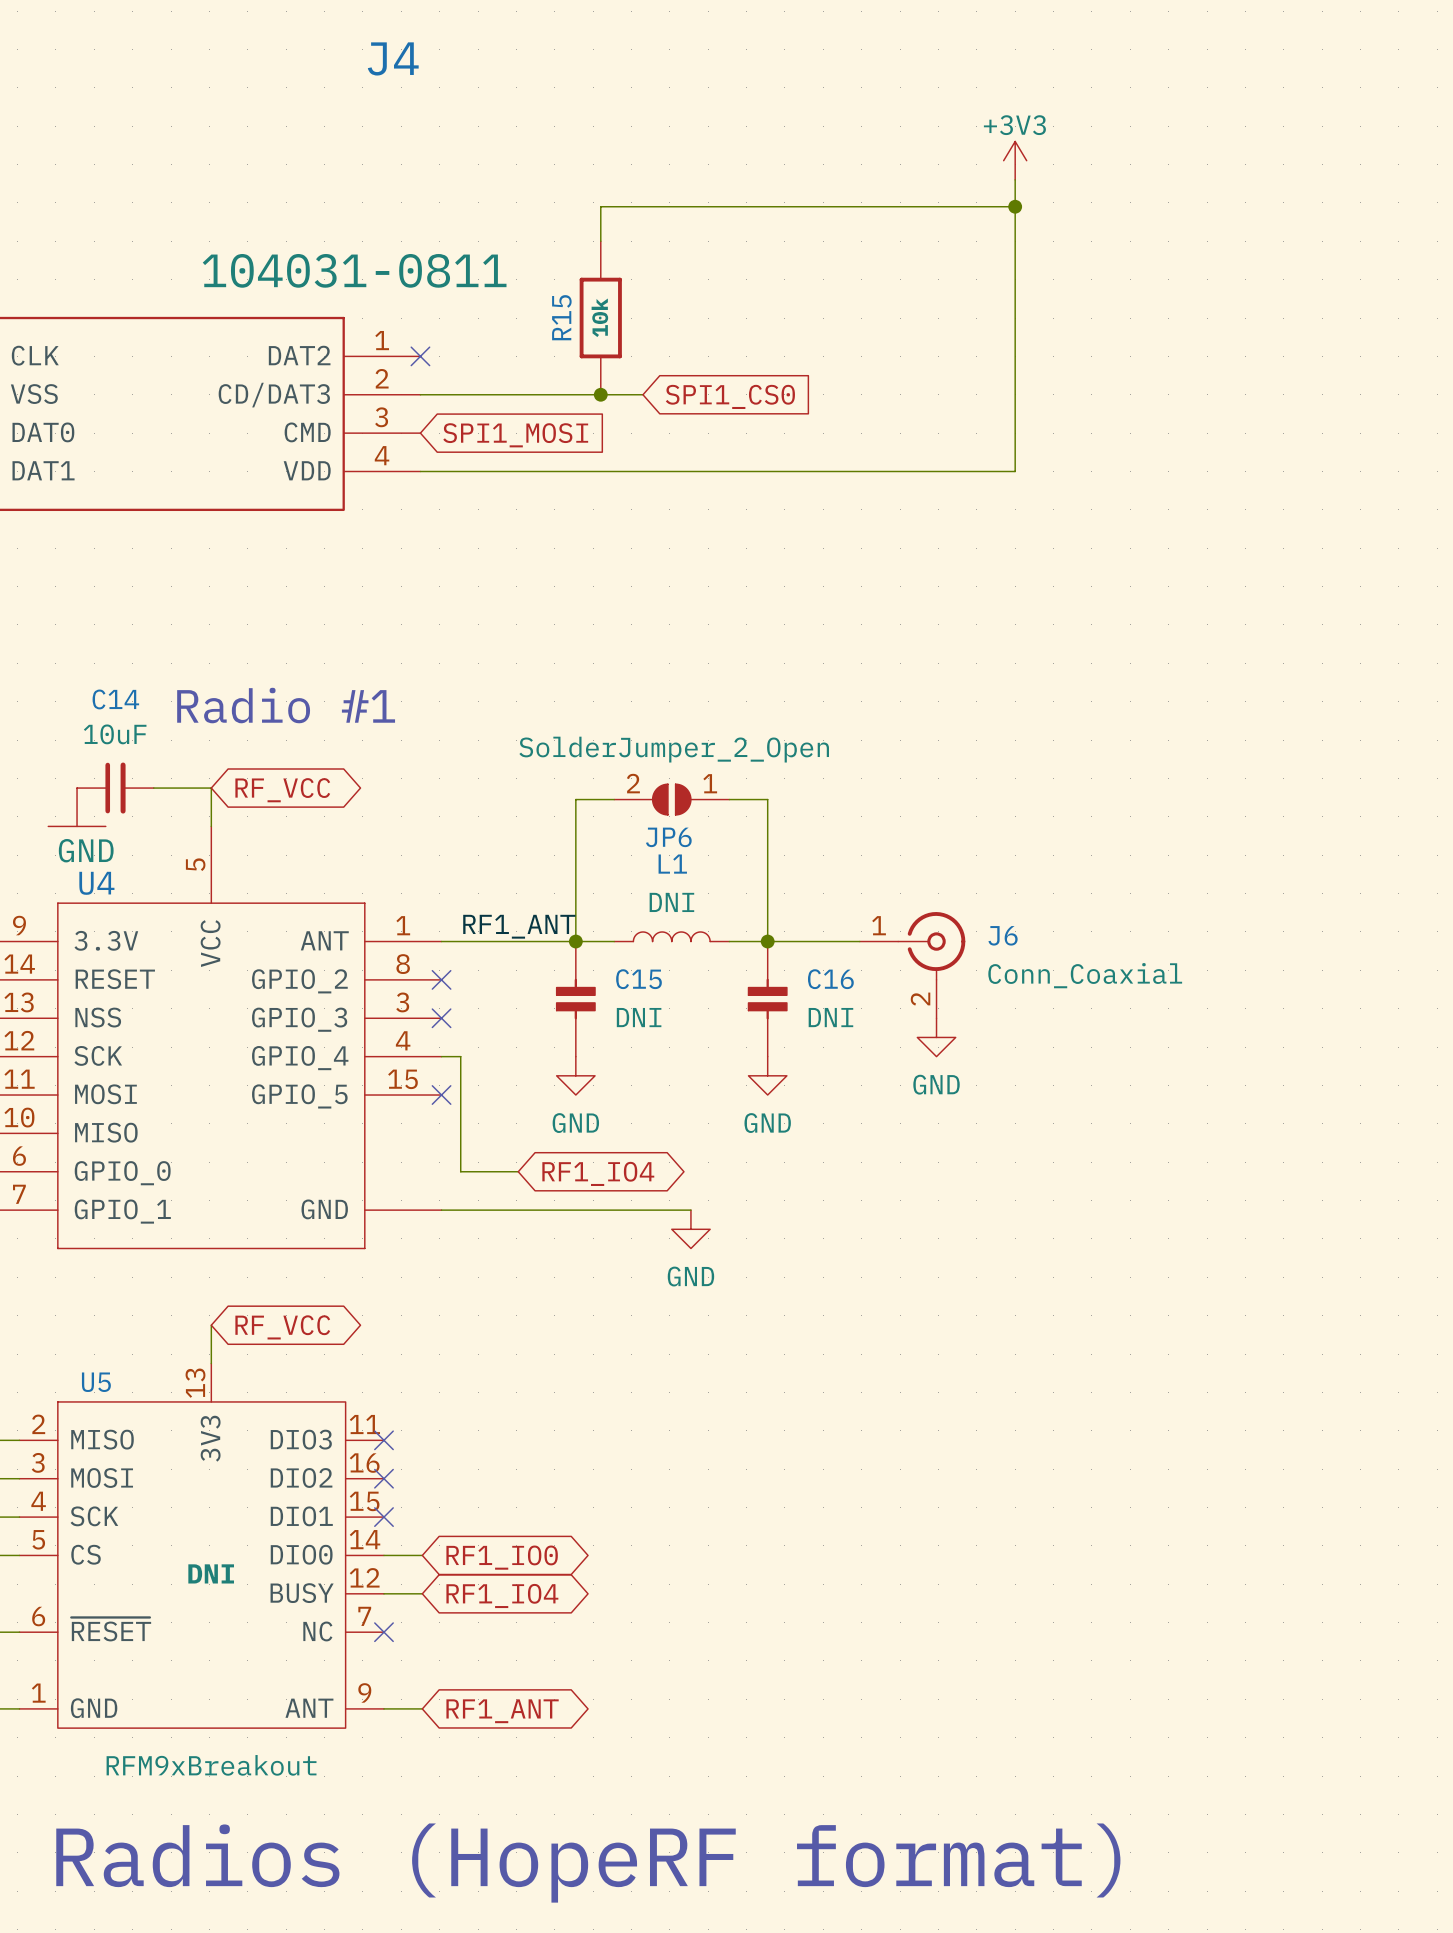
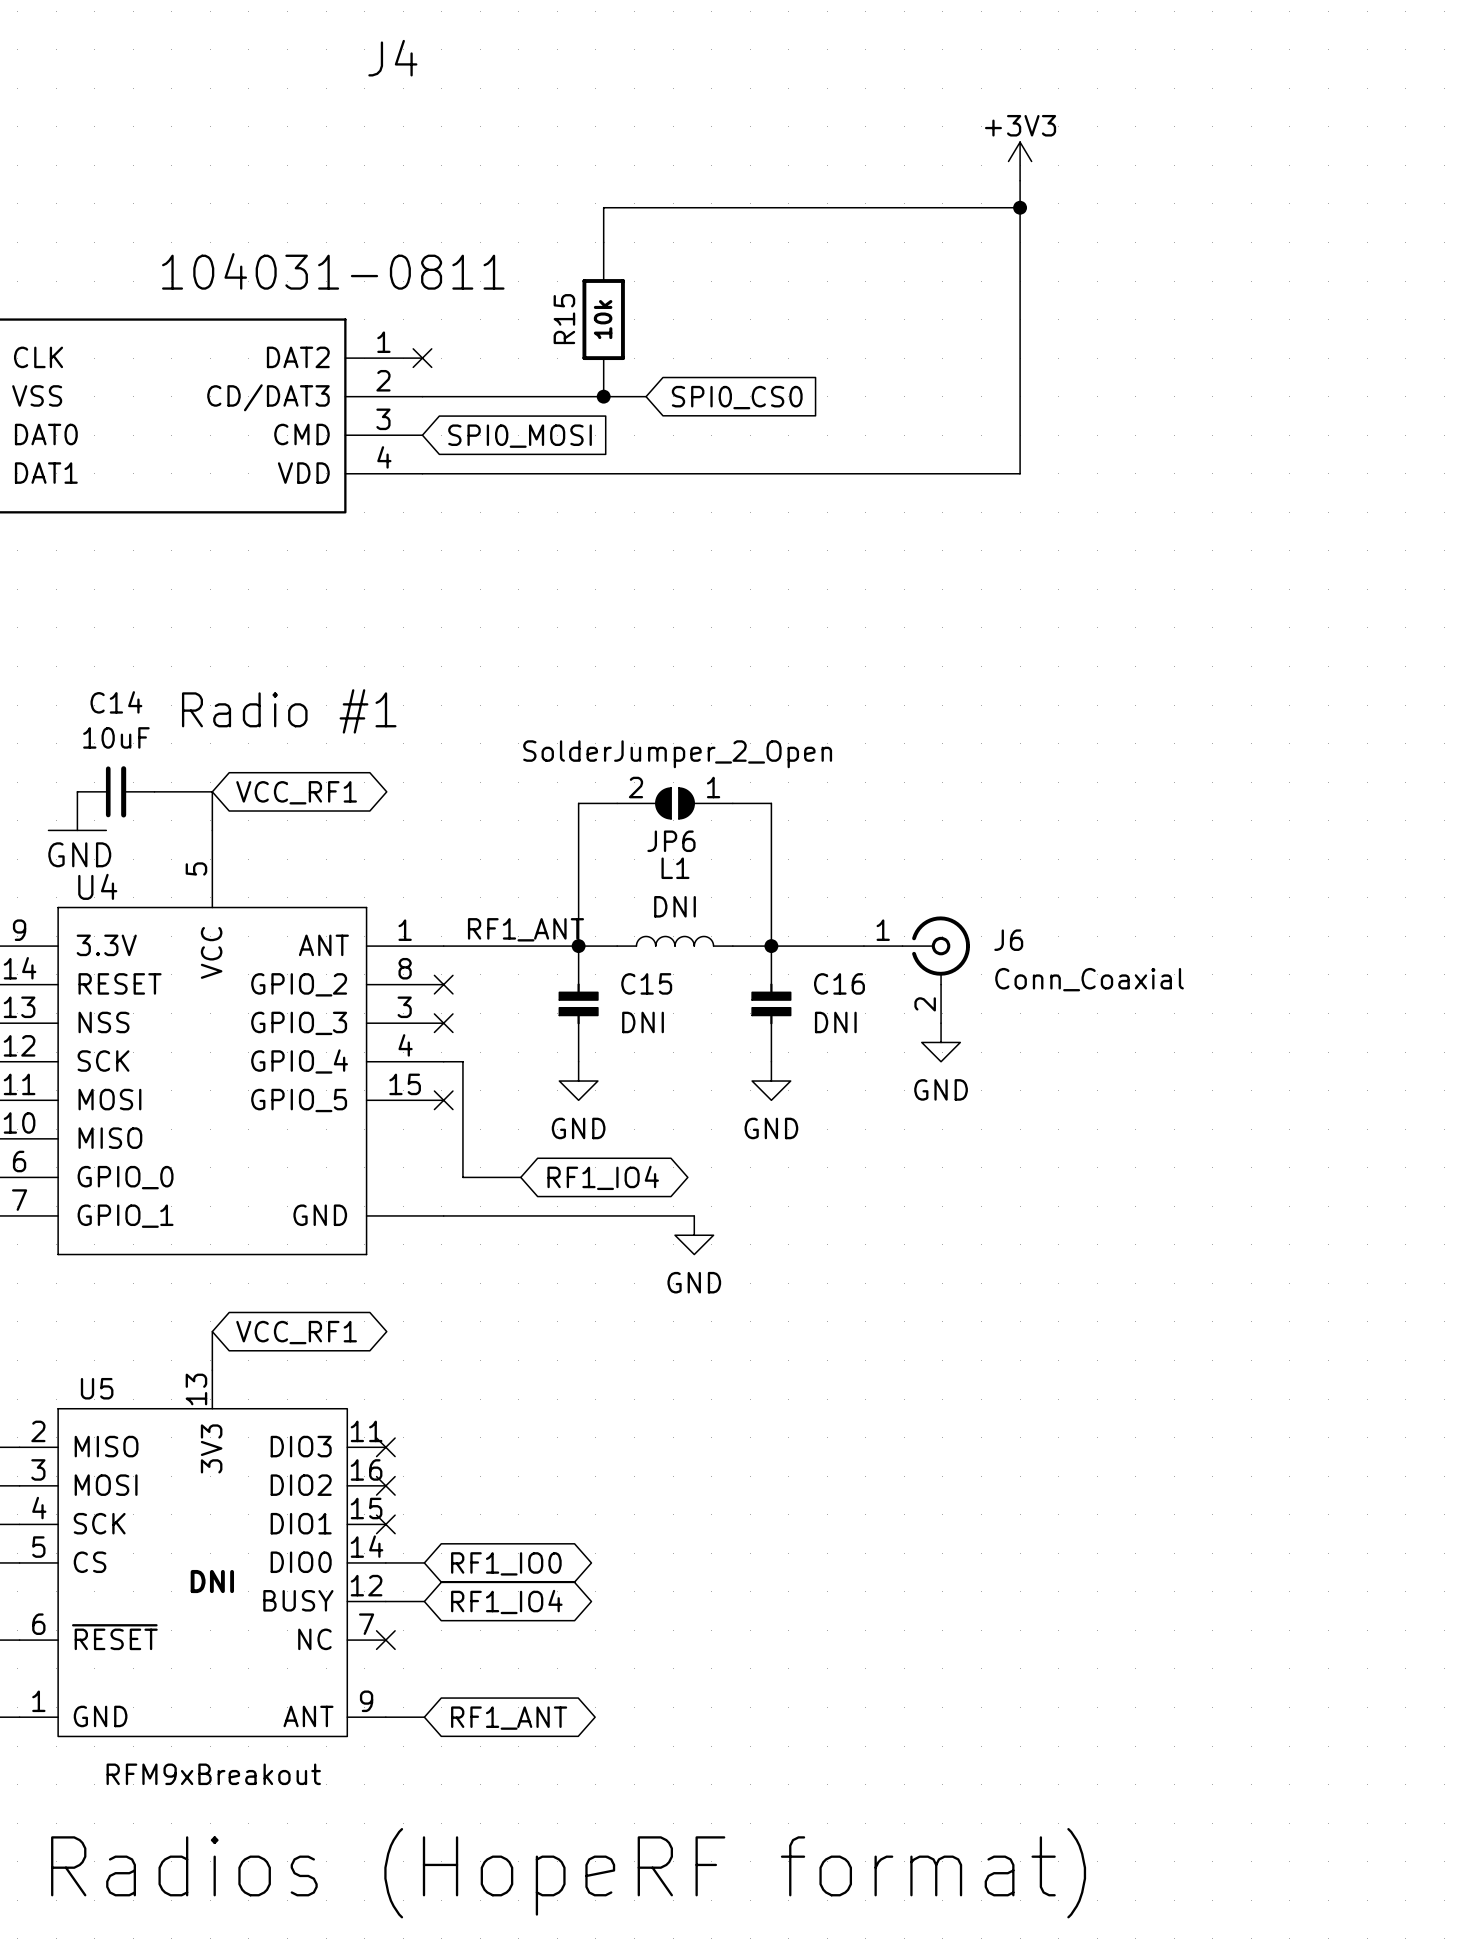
global label: SPI1_CS0 (730, 396) -> SPI0_CS0 (737, 397)
global label: SPI1_MOSI (515, 435) -> SPI0_MOSI (520, 436)
global label: RF_VCC (282, 790) -> VCC_RF1 (296, 792)
global label: RF_VCC (282, 1327) -> VCC_RF1 (296, 1332)

